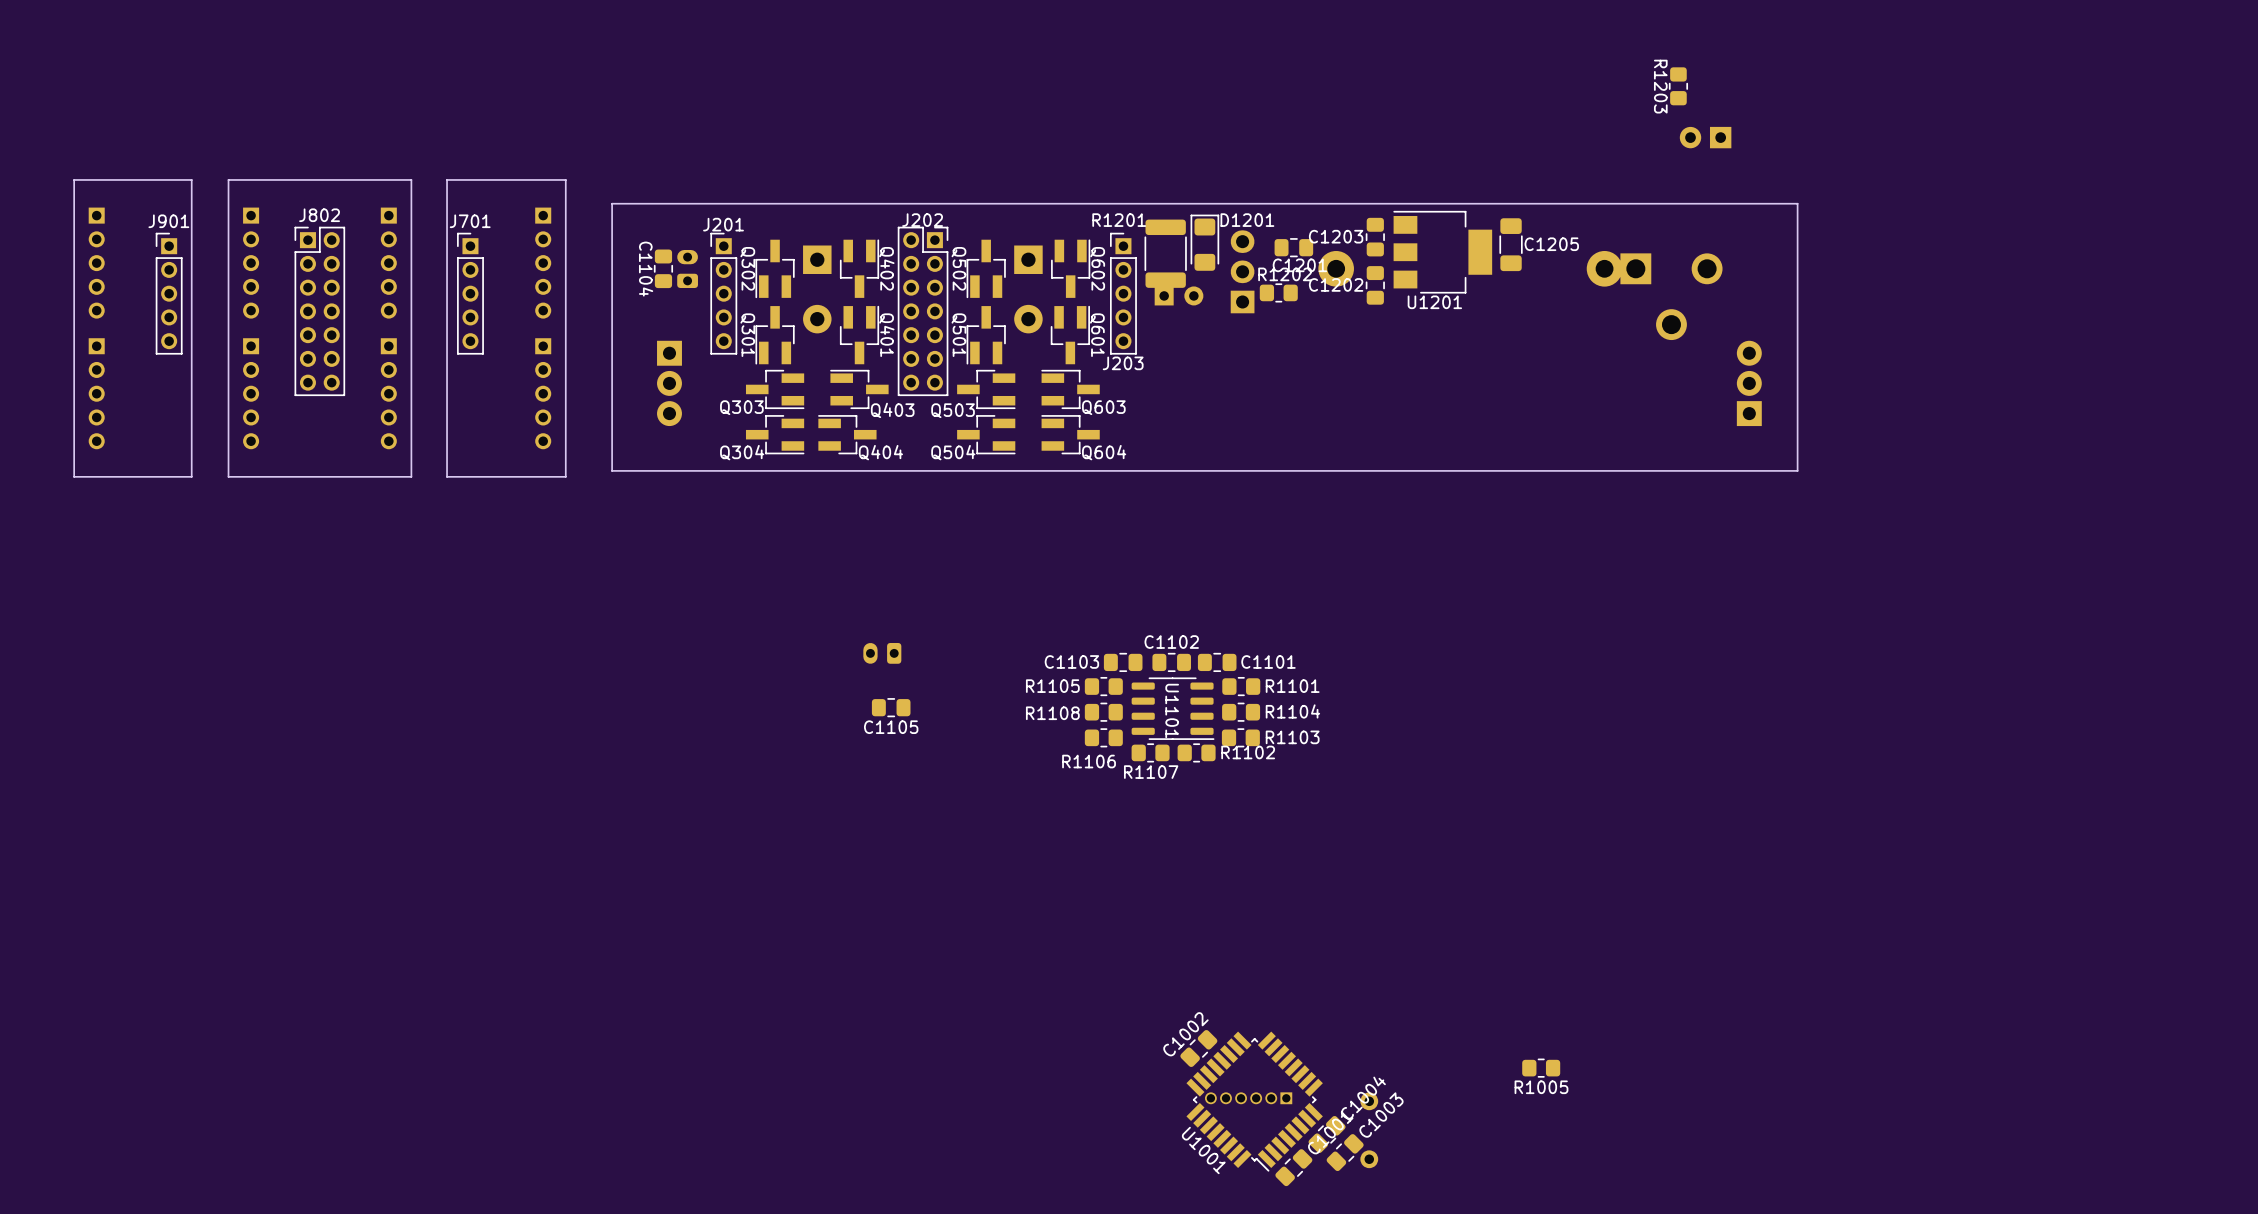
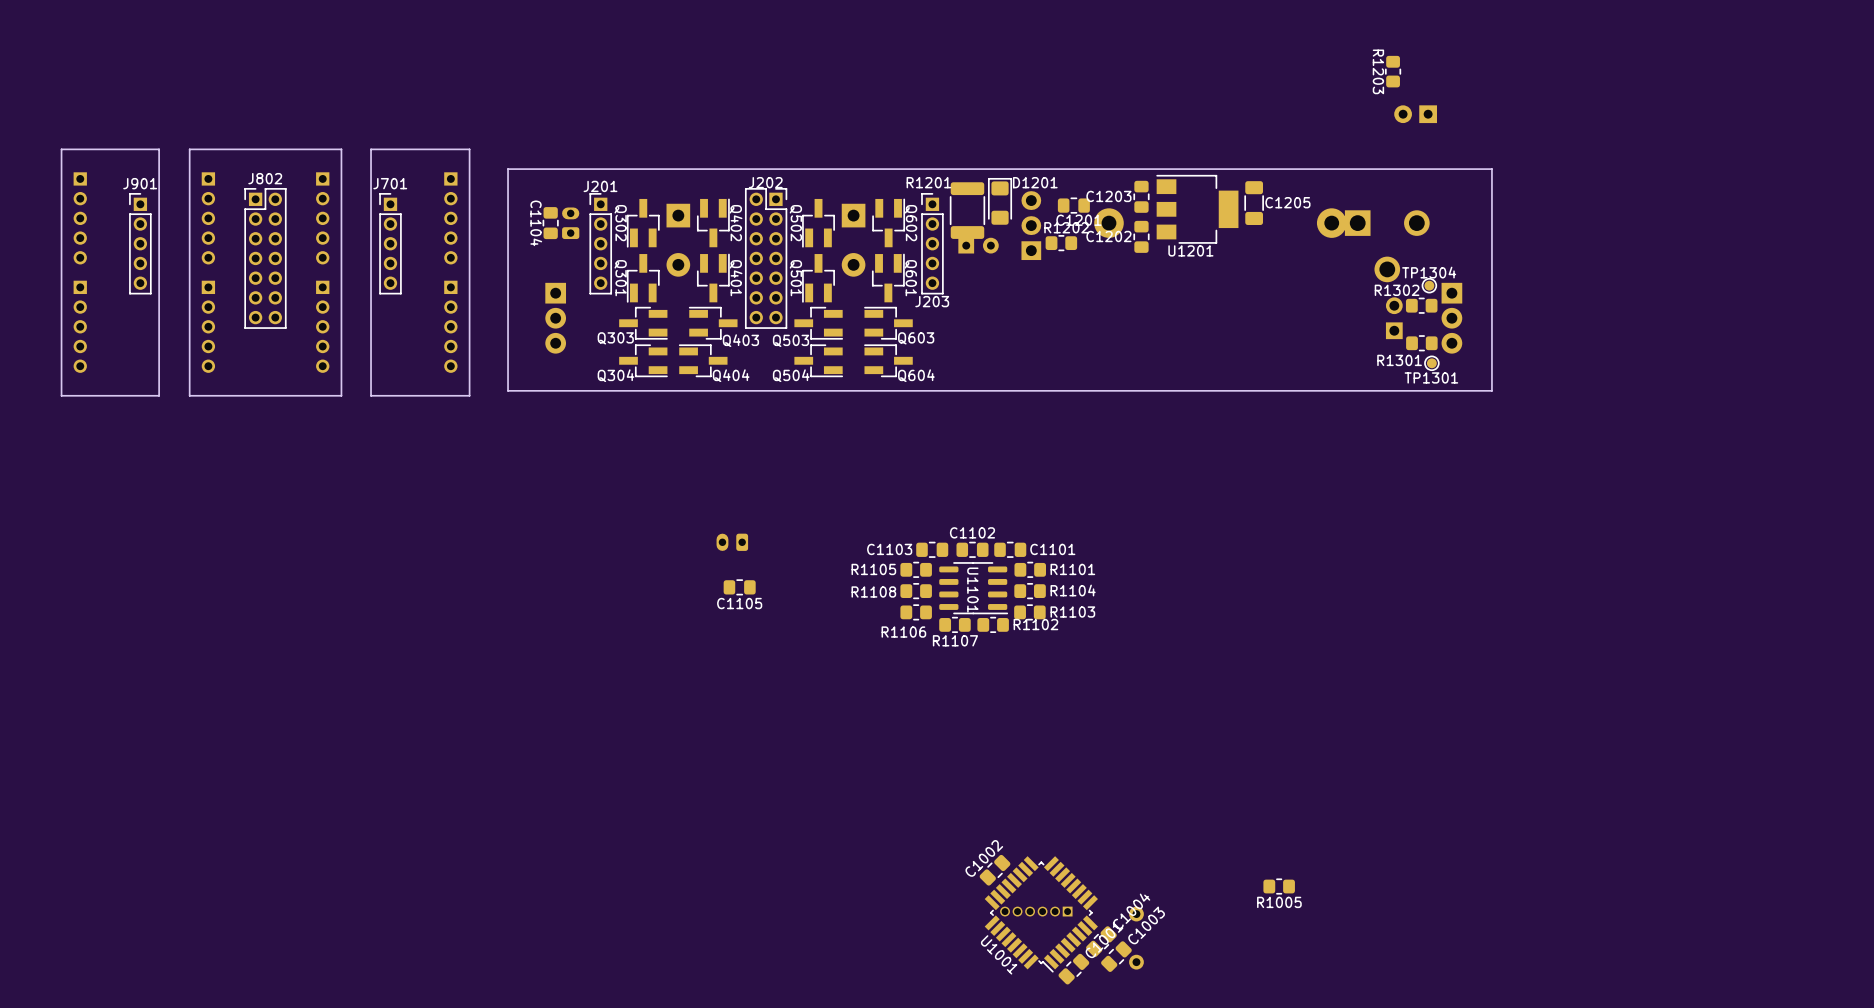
TP1304: none -> (1429, 285)
R1302: none -> (1421, 305)
part: none -> (1394, 318)
part rotation: 0° (1749, 383) -> 180° (1451, 318)
R1301: none -> (1421, 343)
TP1301: none -> (1431, 363)

